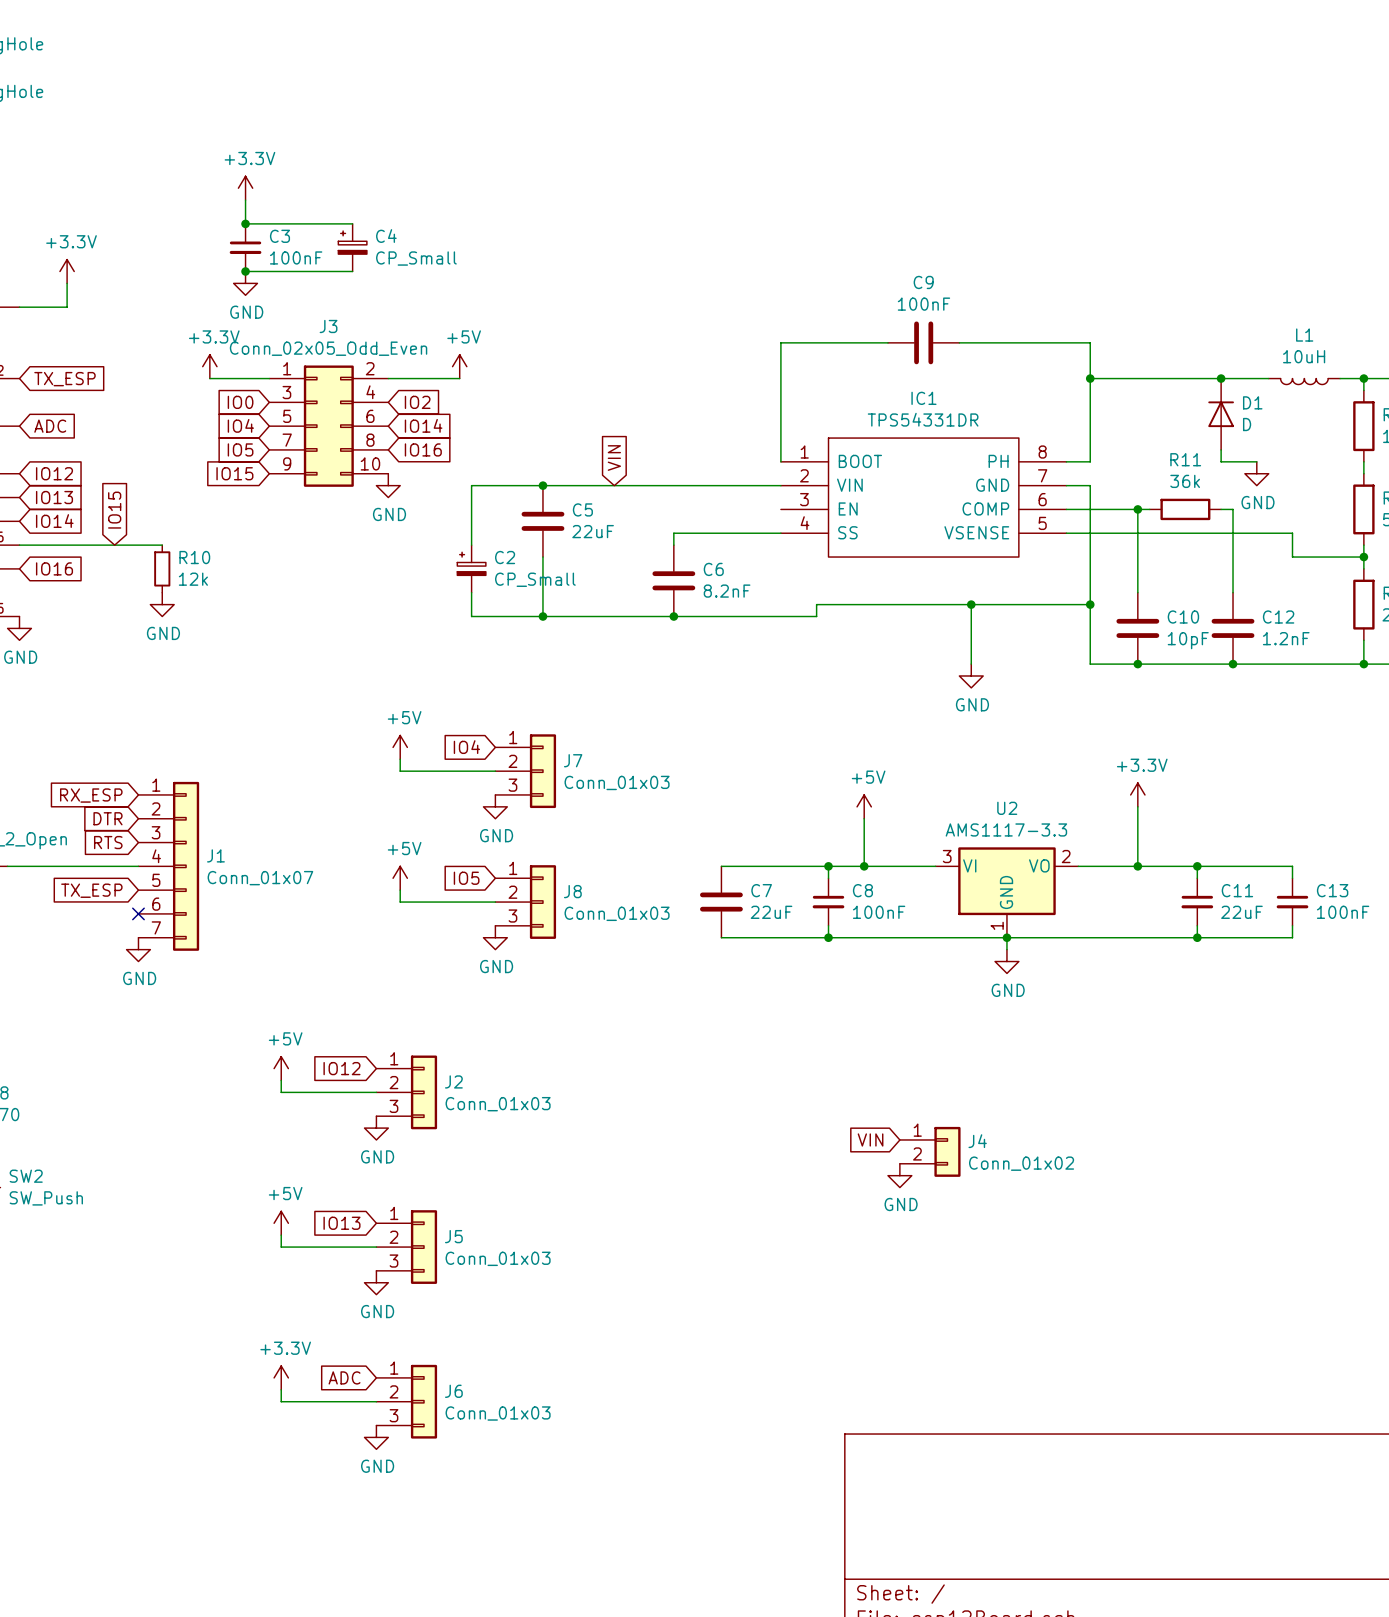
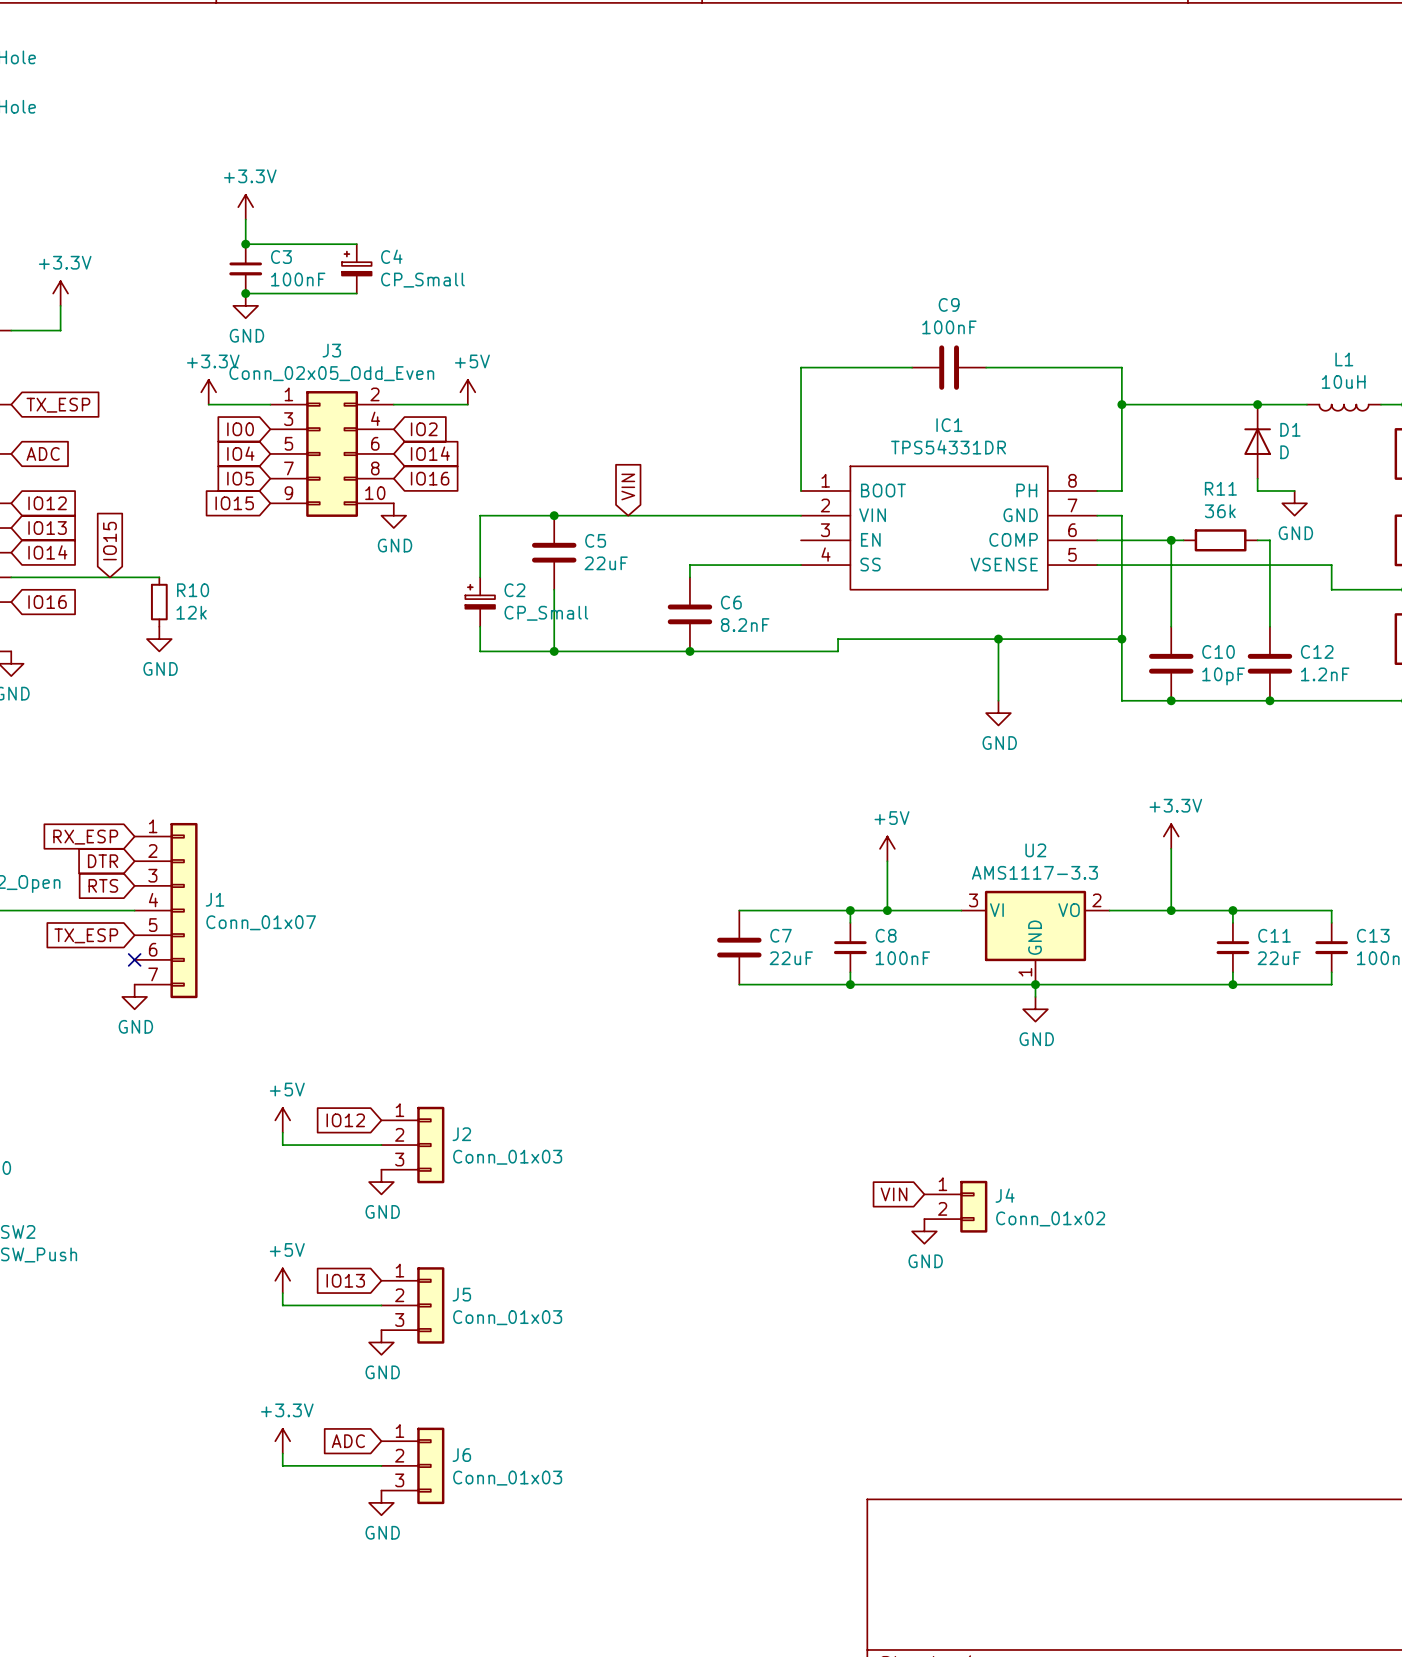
power symbol: +5V (400, 747) -> none
global label: IO4 (466, 747) -> none
wire: (400, 759) (400, 771) (495, 771) -> none
J7: Conn_01x03 (525, 771) -> none
power symbol: GND (495, 806) -> none
power symbol: +5V (400, 878) -> none
global label: IO5 (466, 878) -> none
wire: (400, 890) (400, 902) (495, 902) -> none
J8: Conn_01x03 (525, 902) -> none
power symbol: GND (495, 937) -> none

